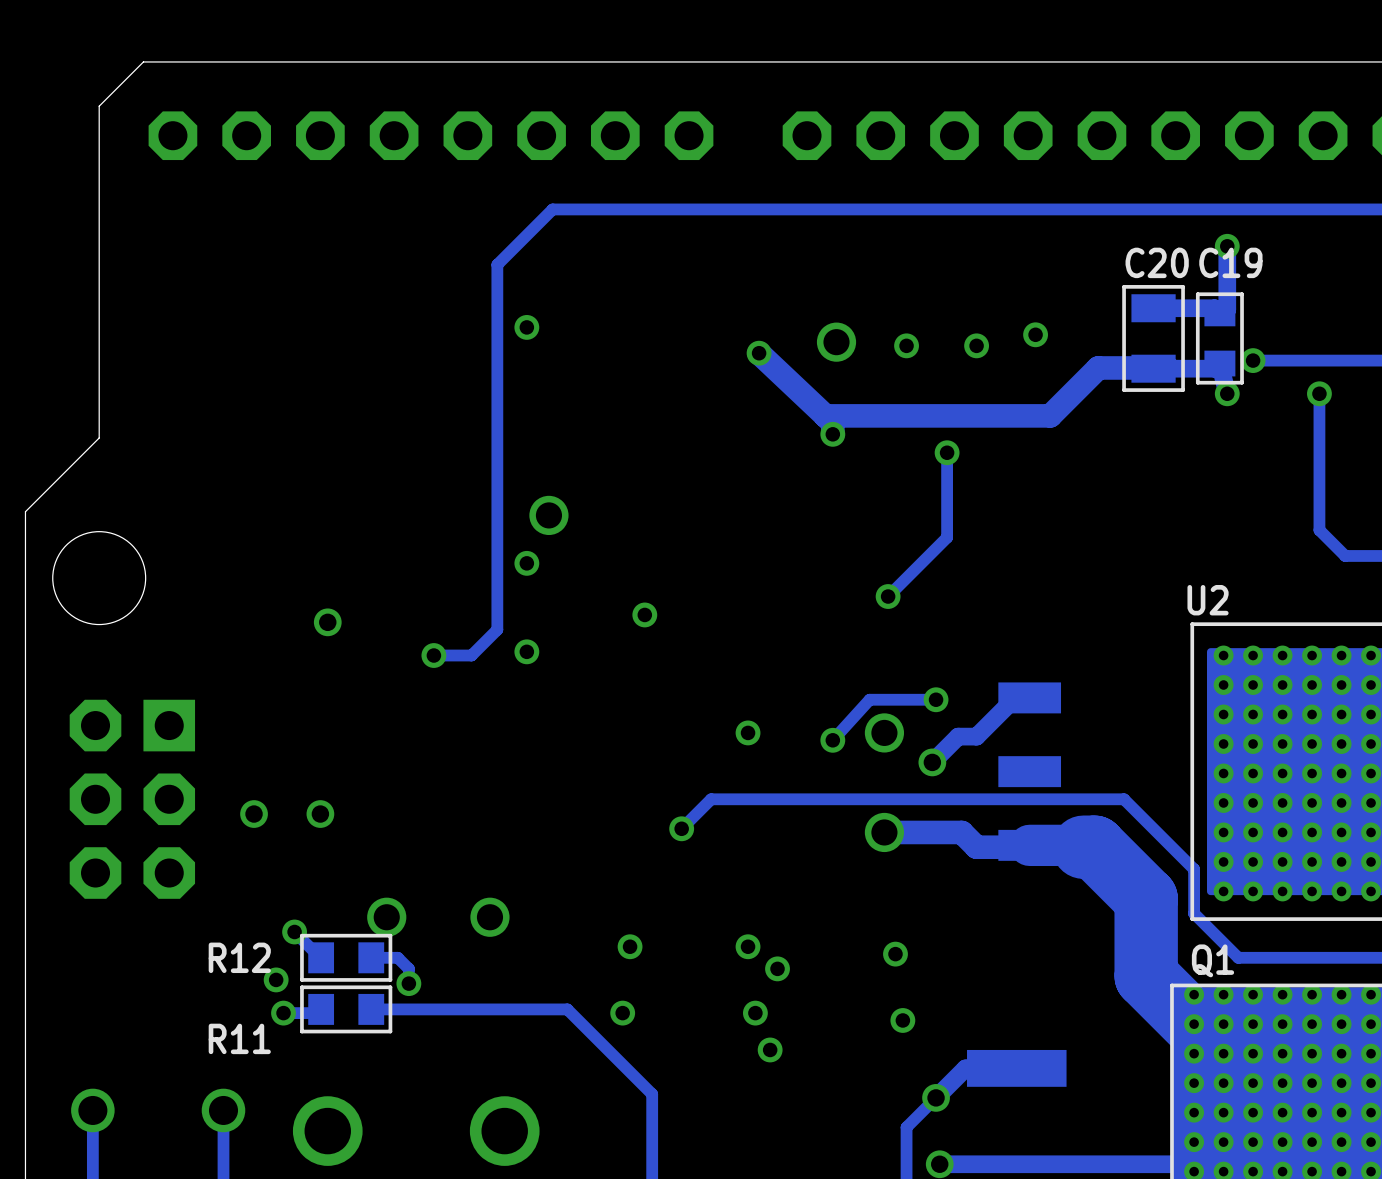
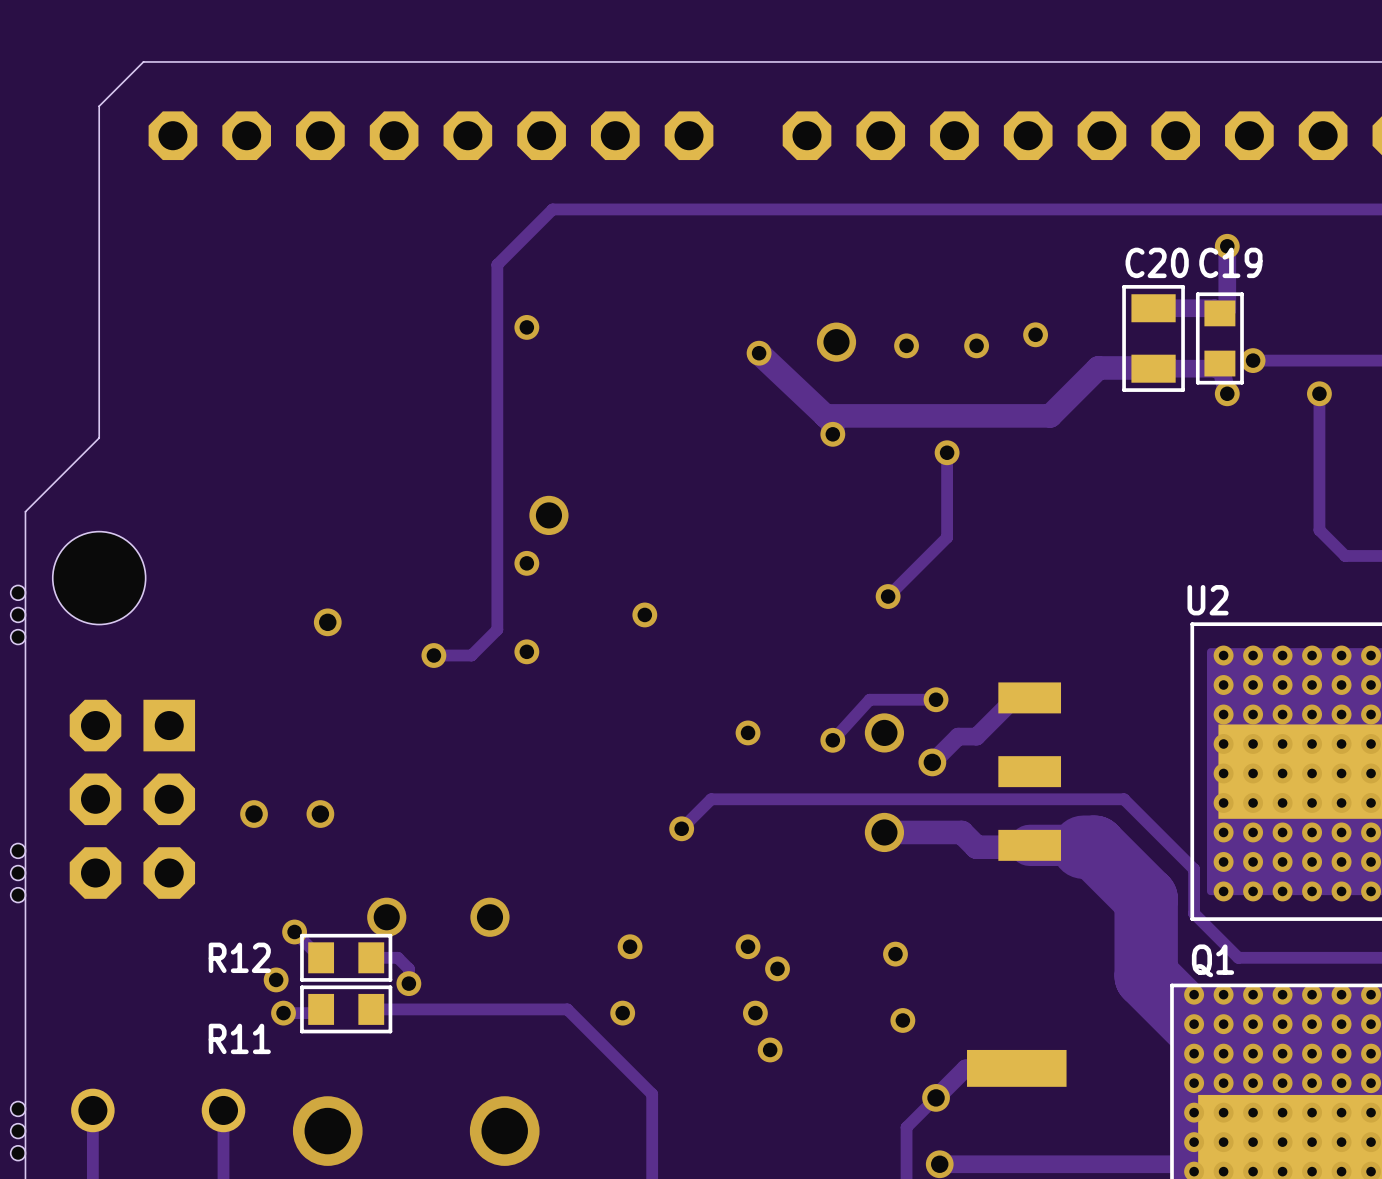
hole: none -> (18, 592)
hole: none -> (18, 614)
hole: none -> (18, 637)
hole: none -> (18, 850)
hole: none -> (18, 873)
hole: none -> (18, 895)
hole: none -> (18, 1108)
hole: none -> (18, 1131)
hole: none -> (18, 1153)

